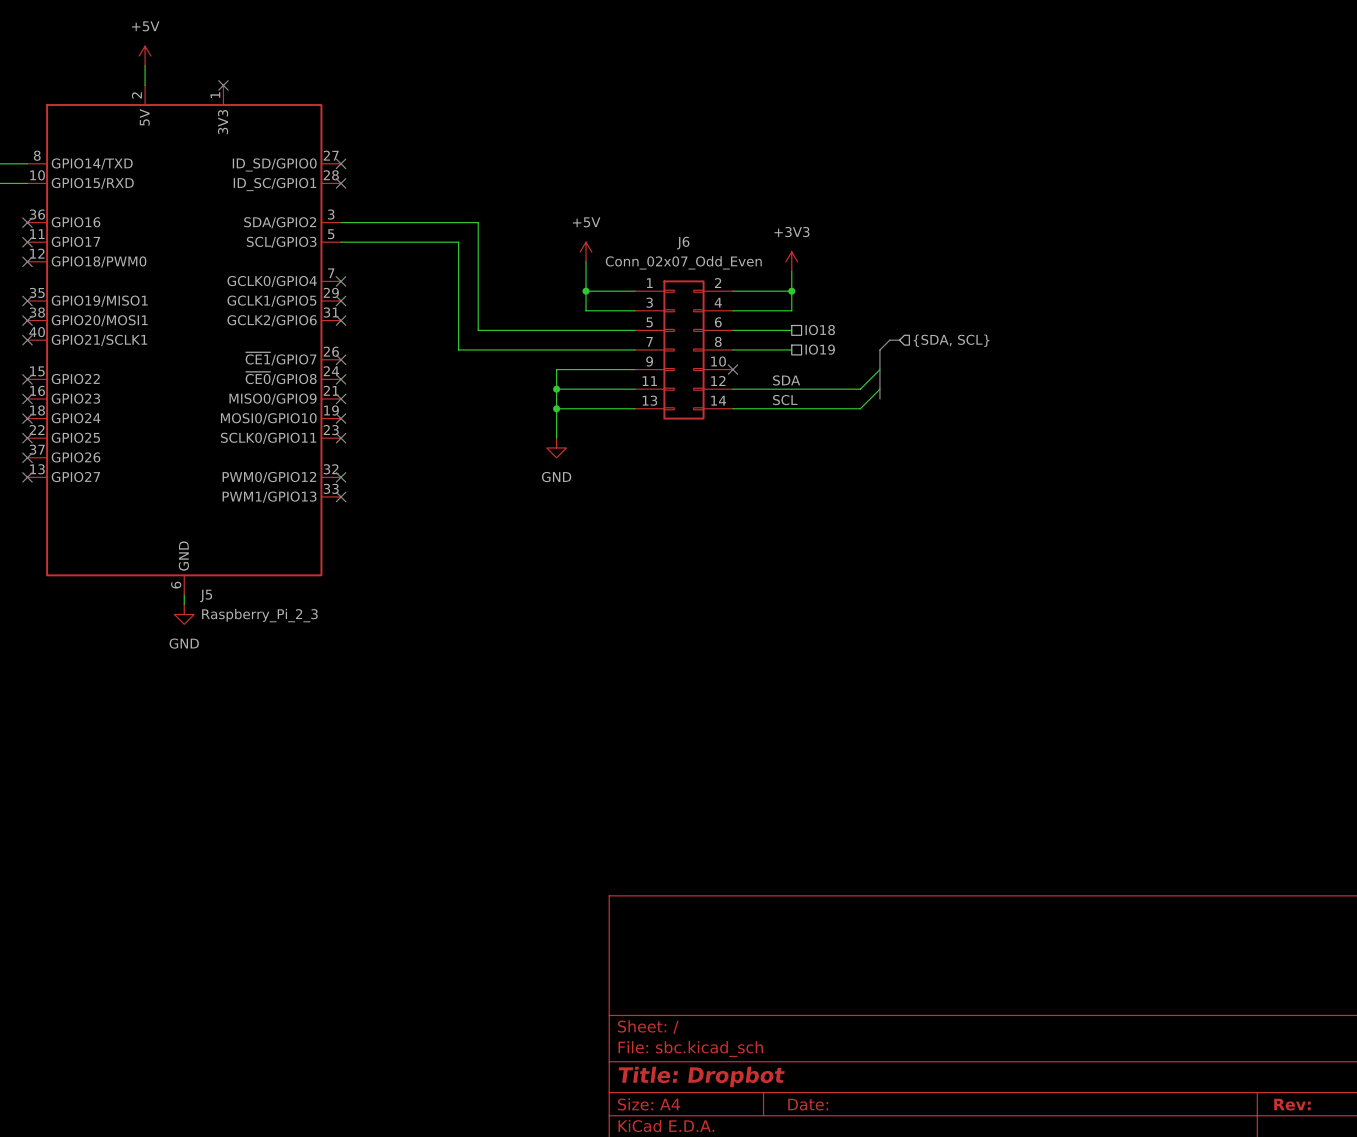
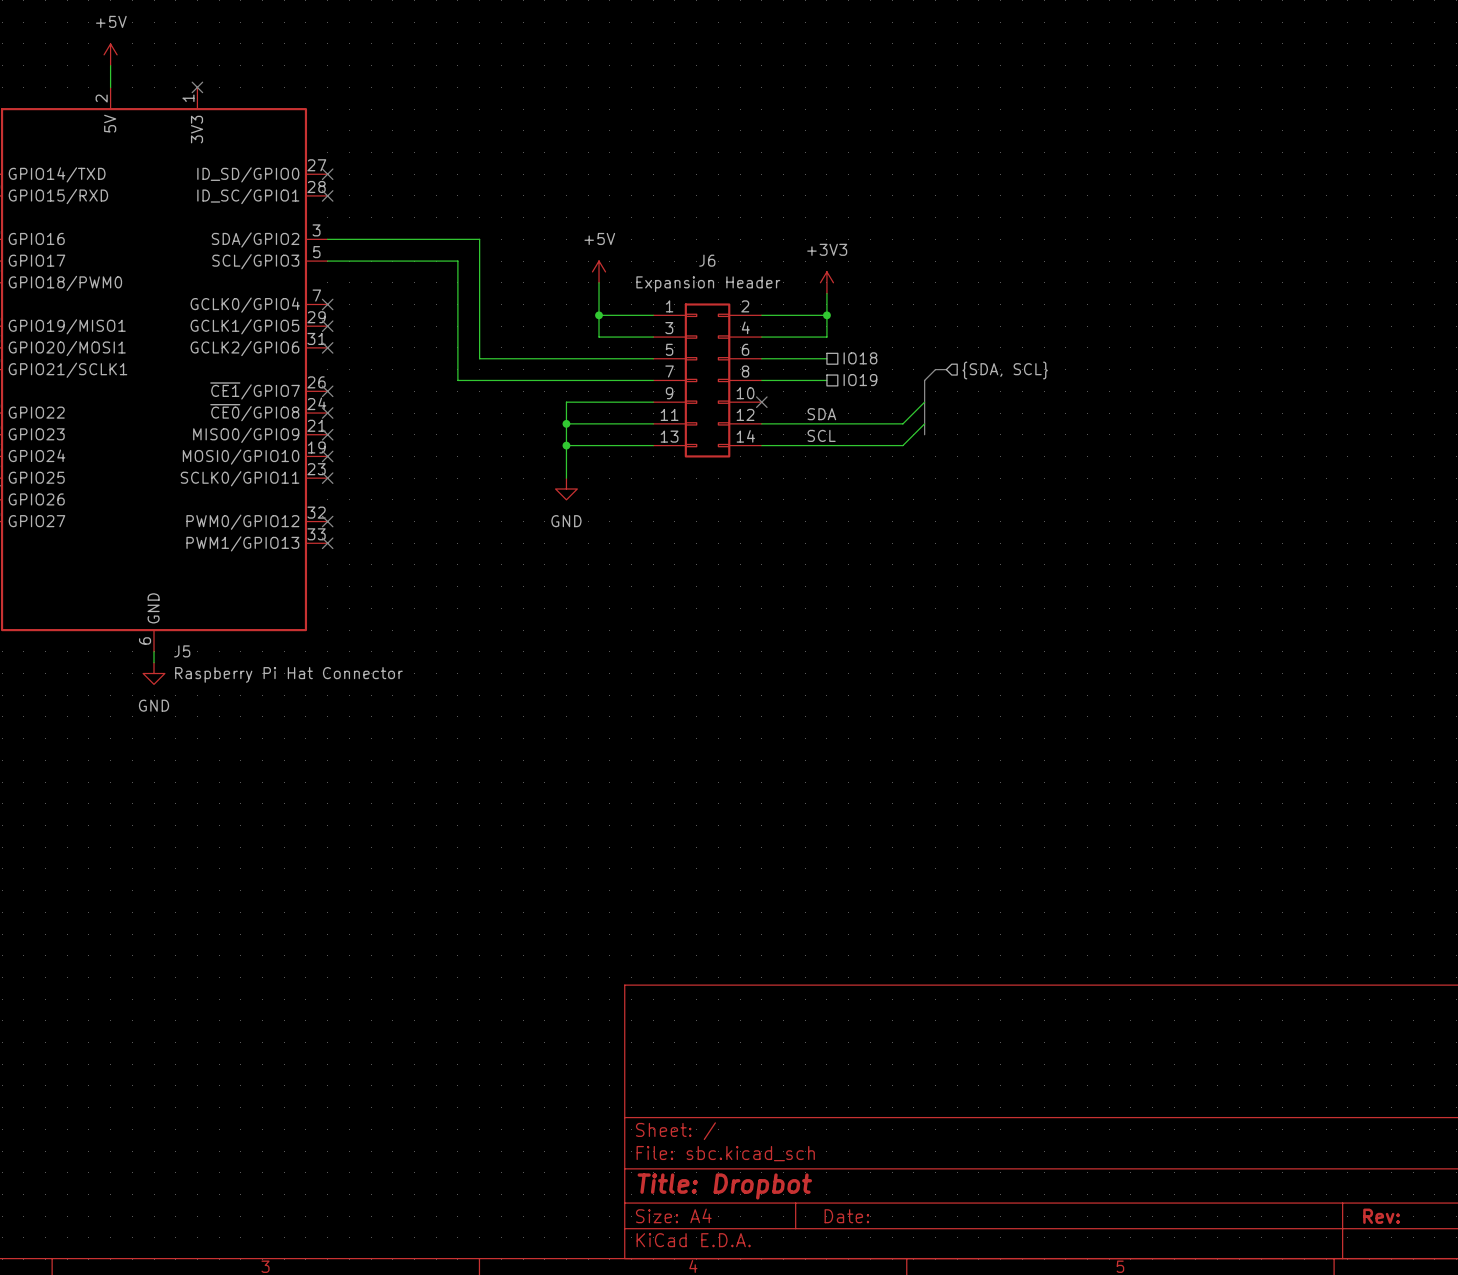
J6 value: Conn_02x07_Odd_Even (683, 262) -> Expansion Header (708, 284)
J5 value: Raspberry_Pi_2_3 (259, 615) -> Raspberry Pi Hat Connector (288, 674)

